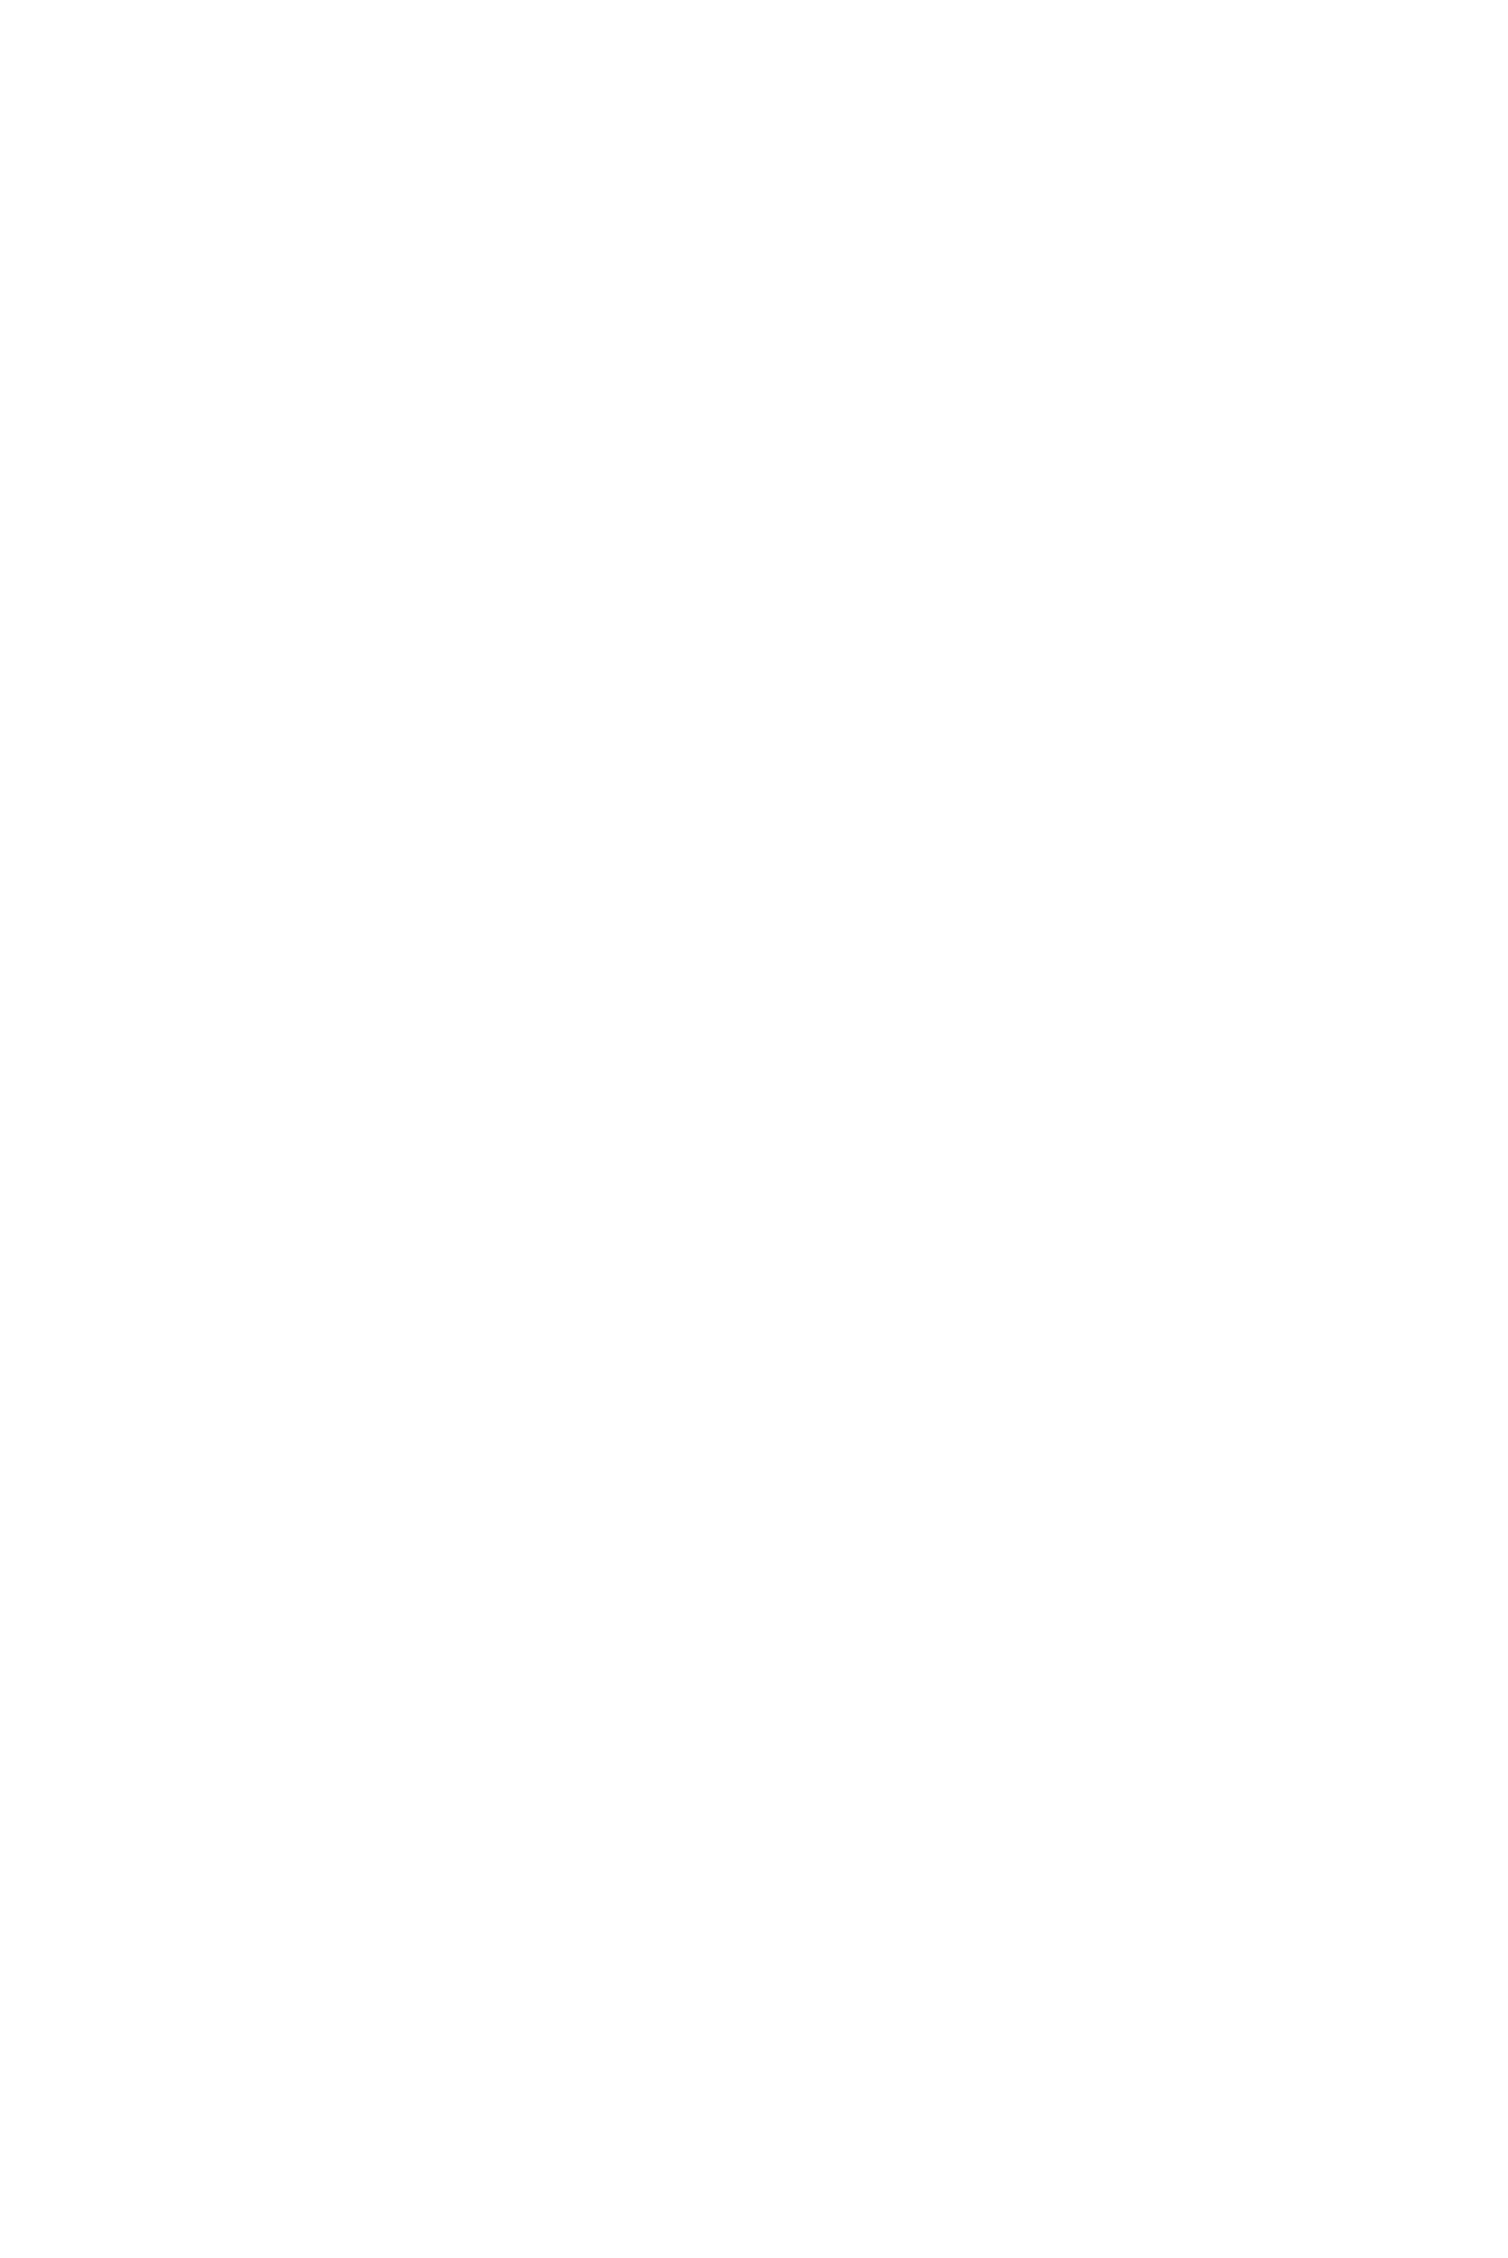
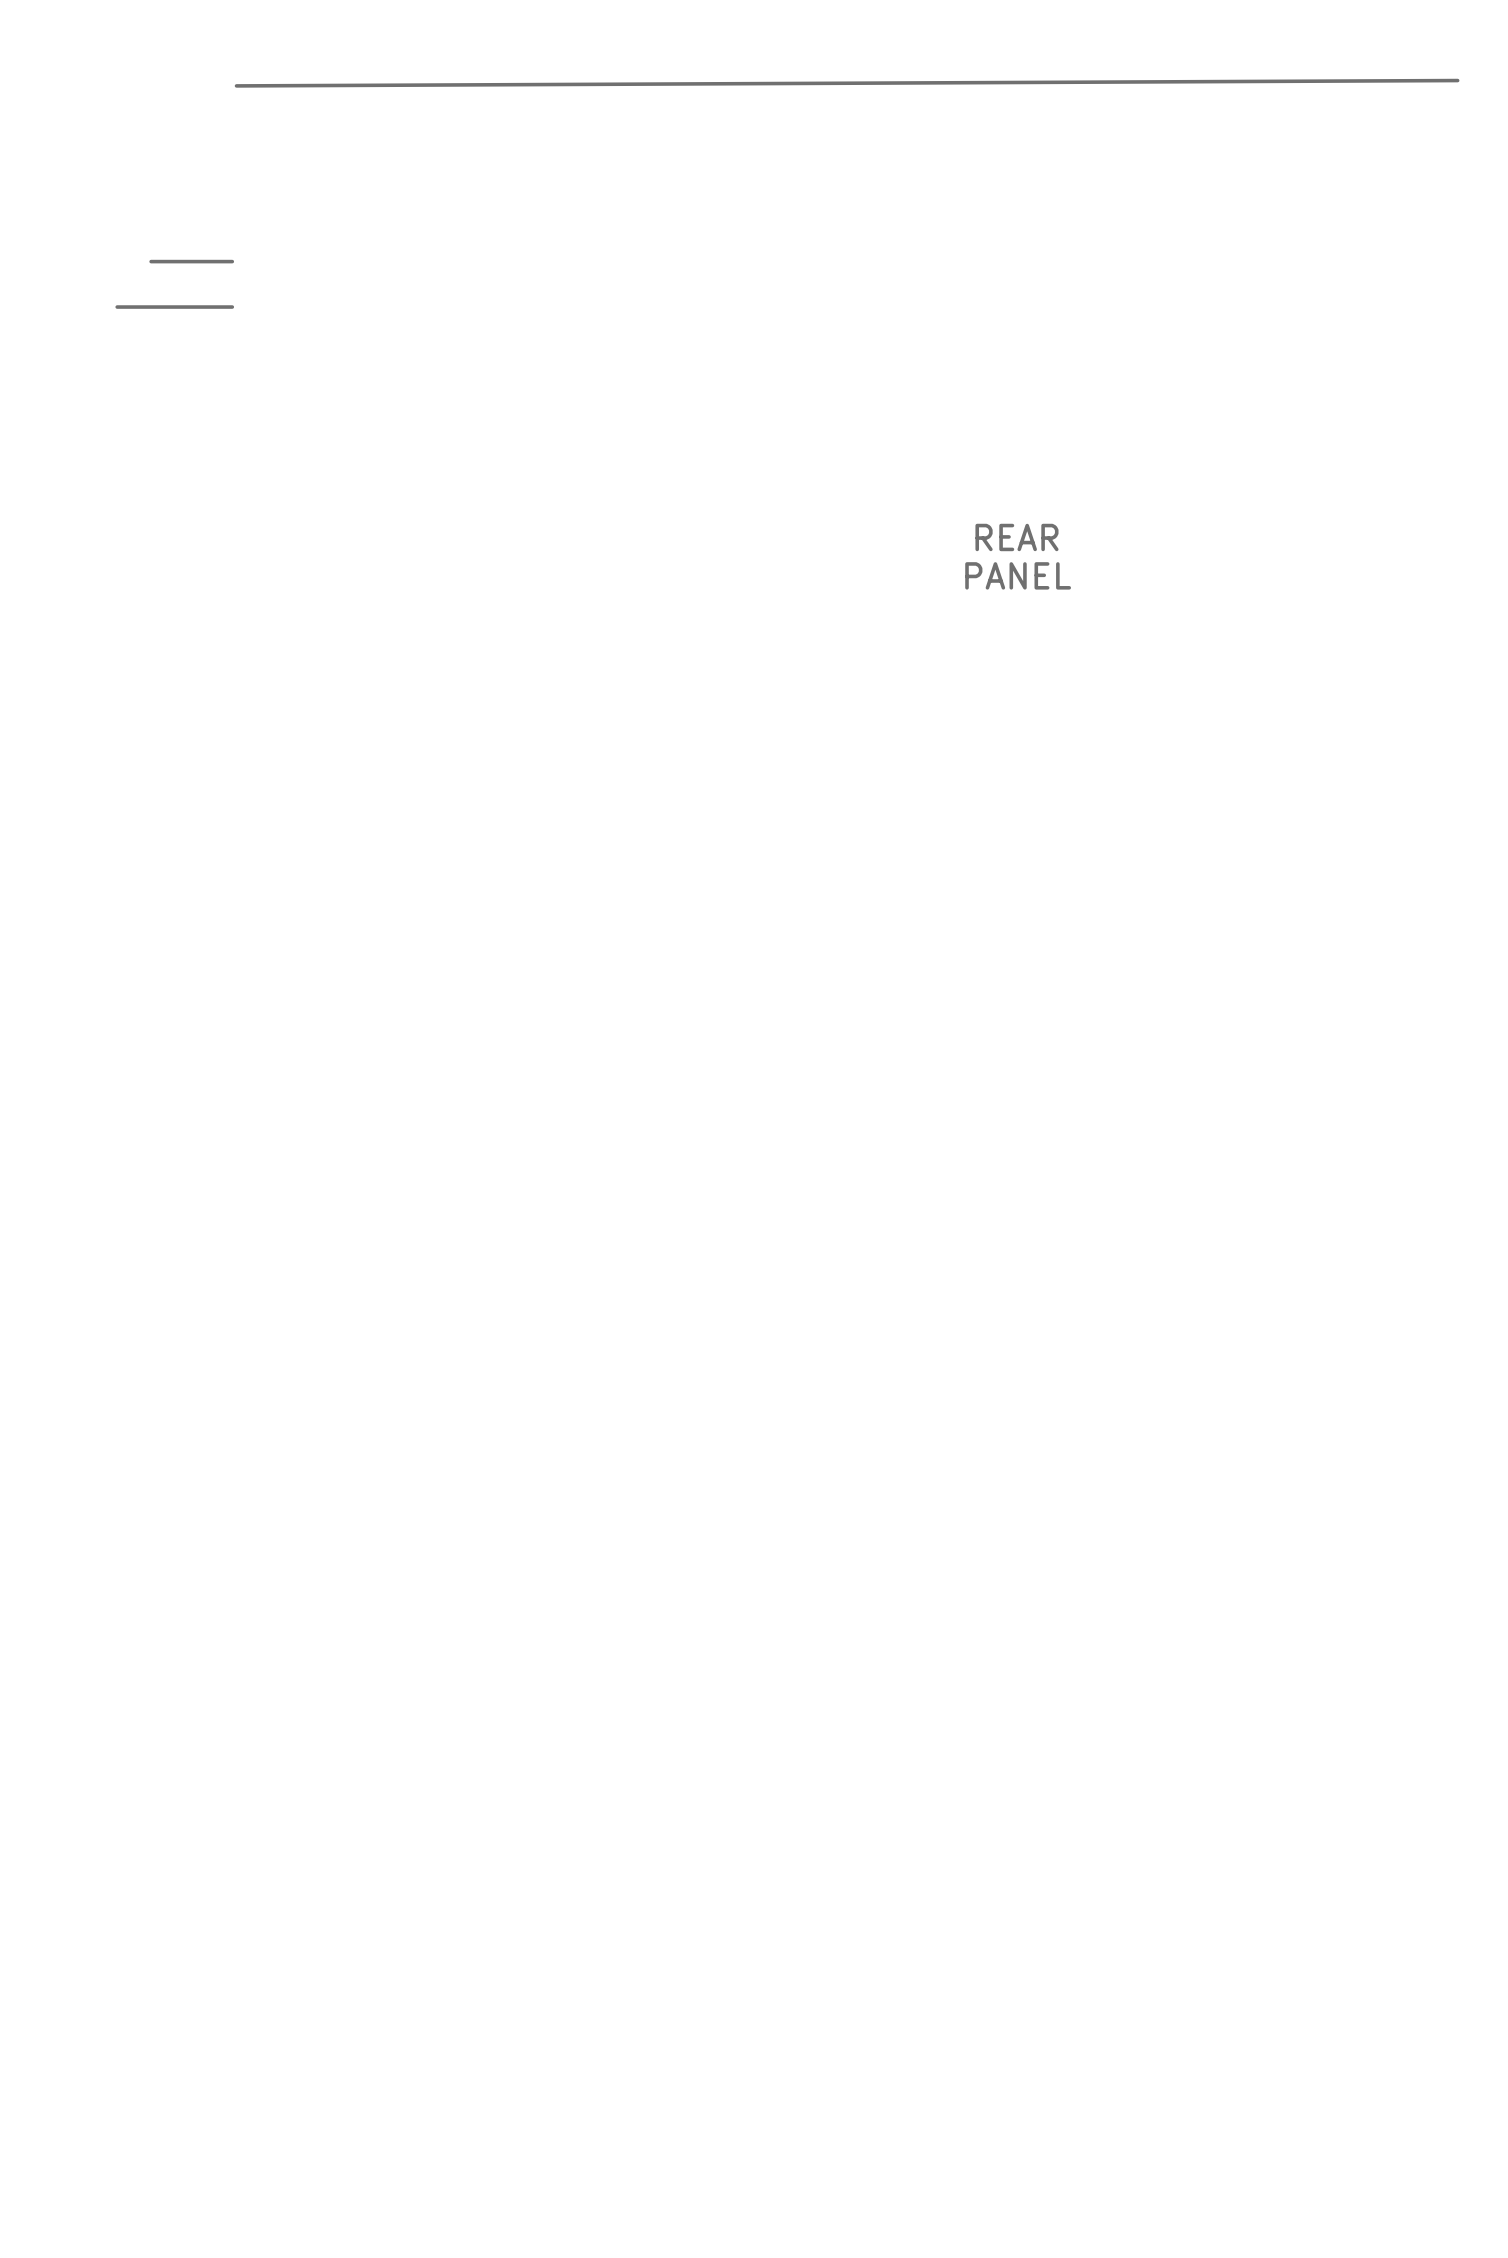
line: none -> (1457, 80) (236, 85)
line: none -> (151, 261) (232, 261)
line: none -> (117, 307) (232, 307)
text: none -> REAR (1016, 537)
text: none -> PANEL (1018, 575)

